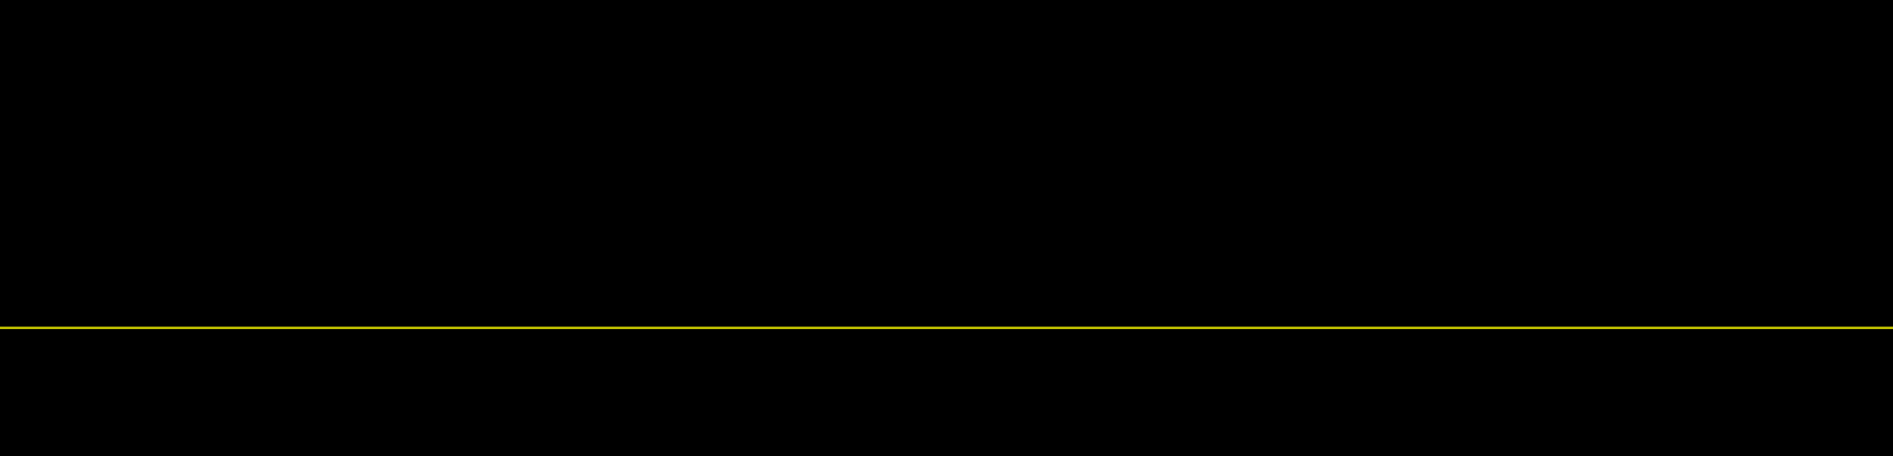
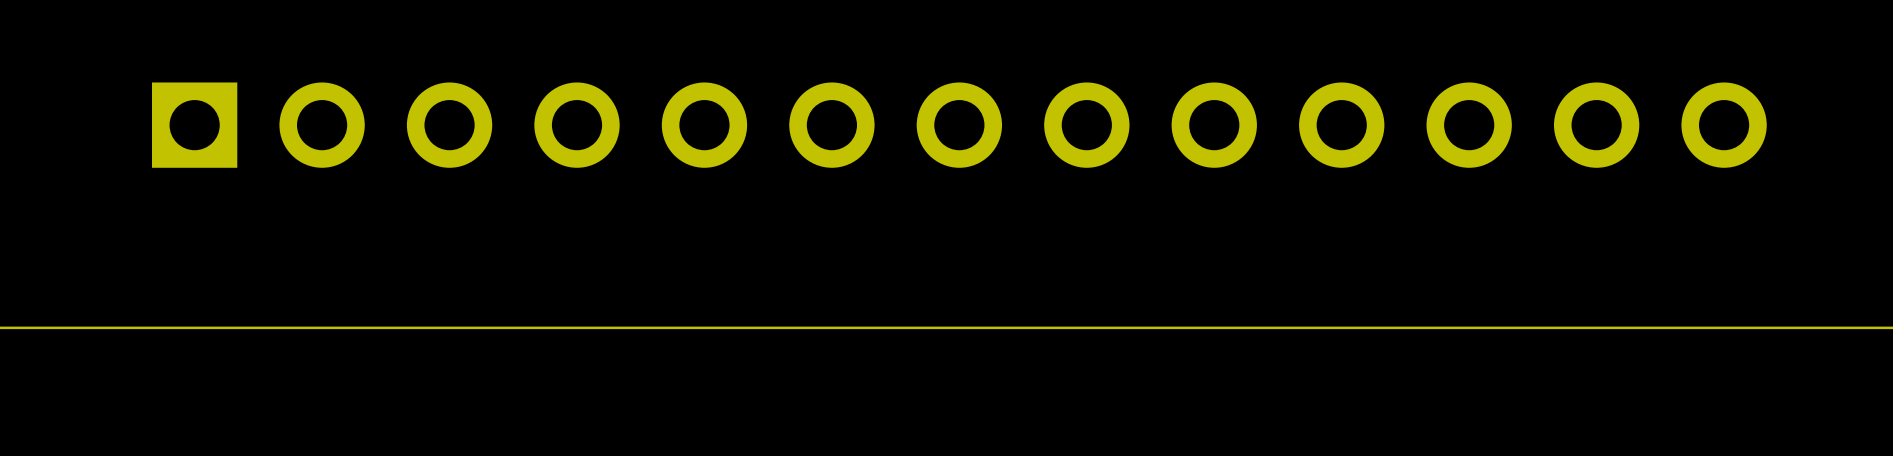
part: none -> (959, 125)

